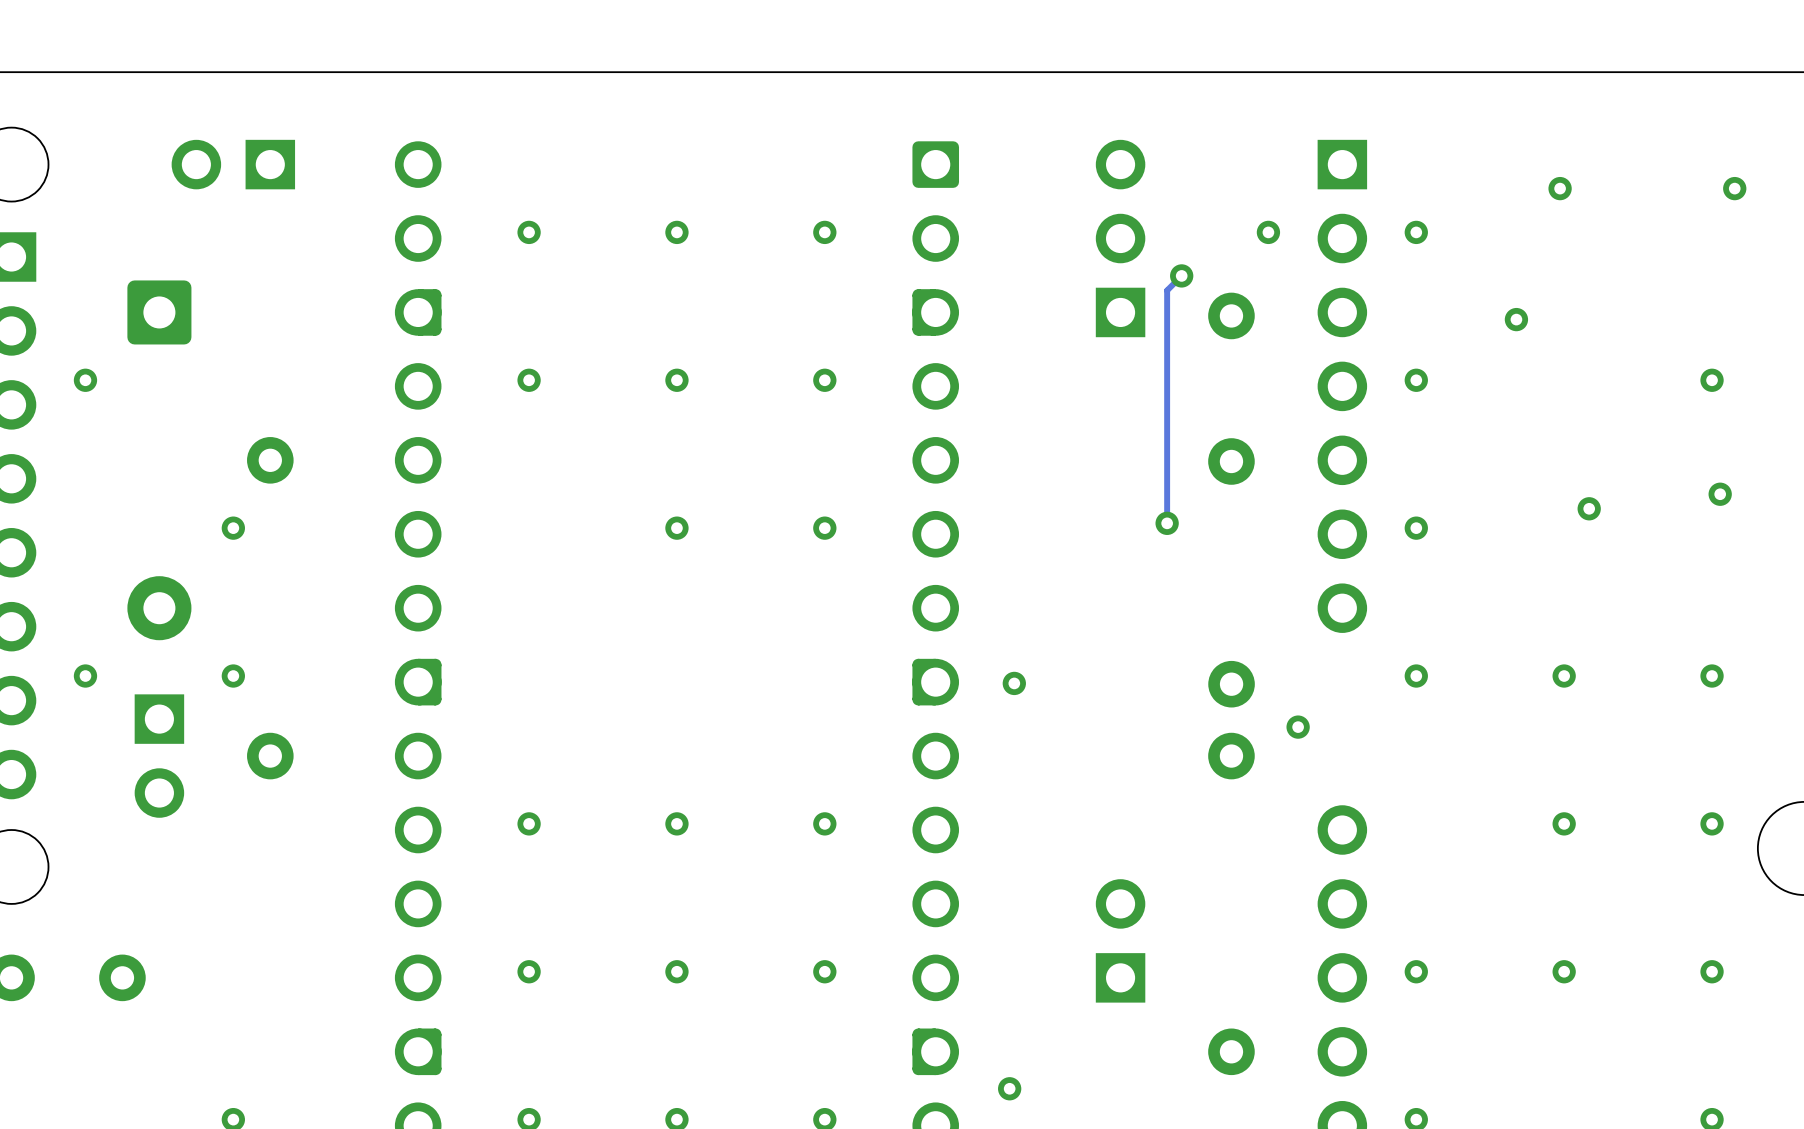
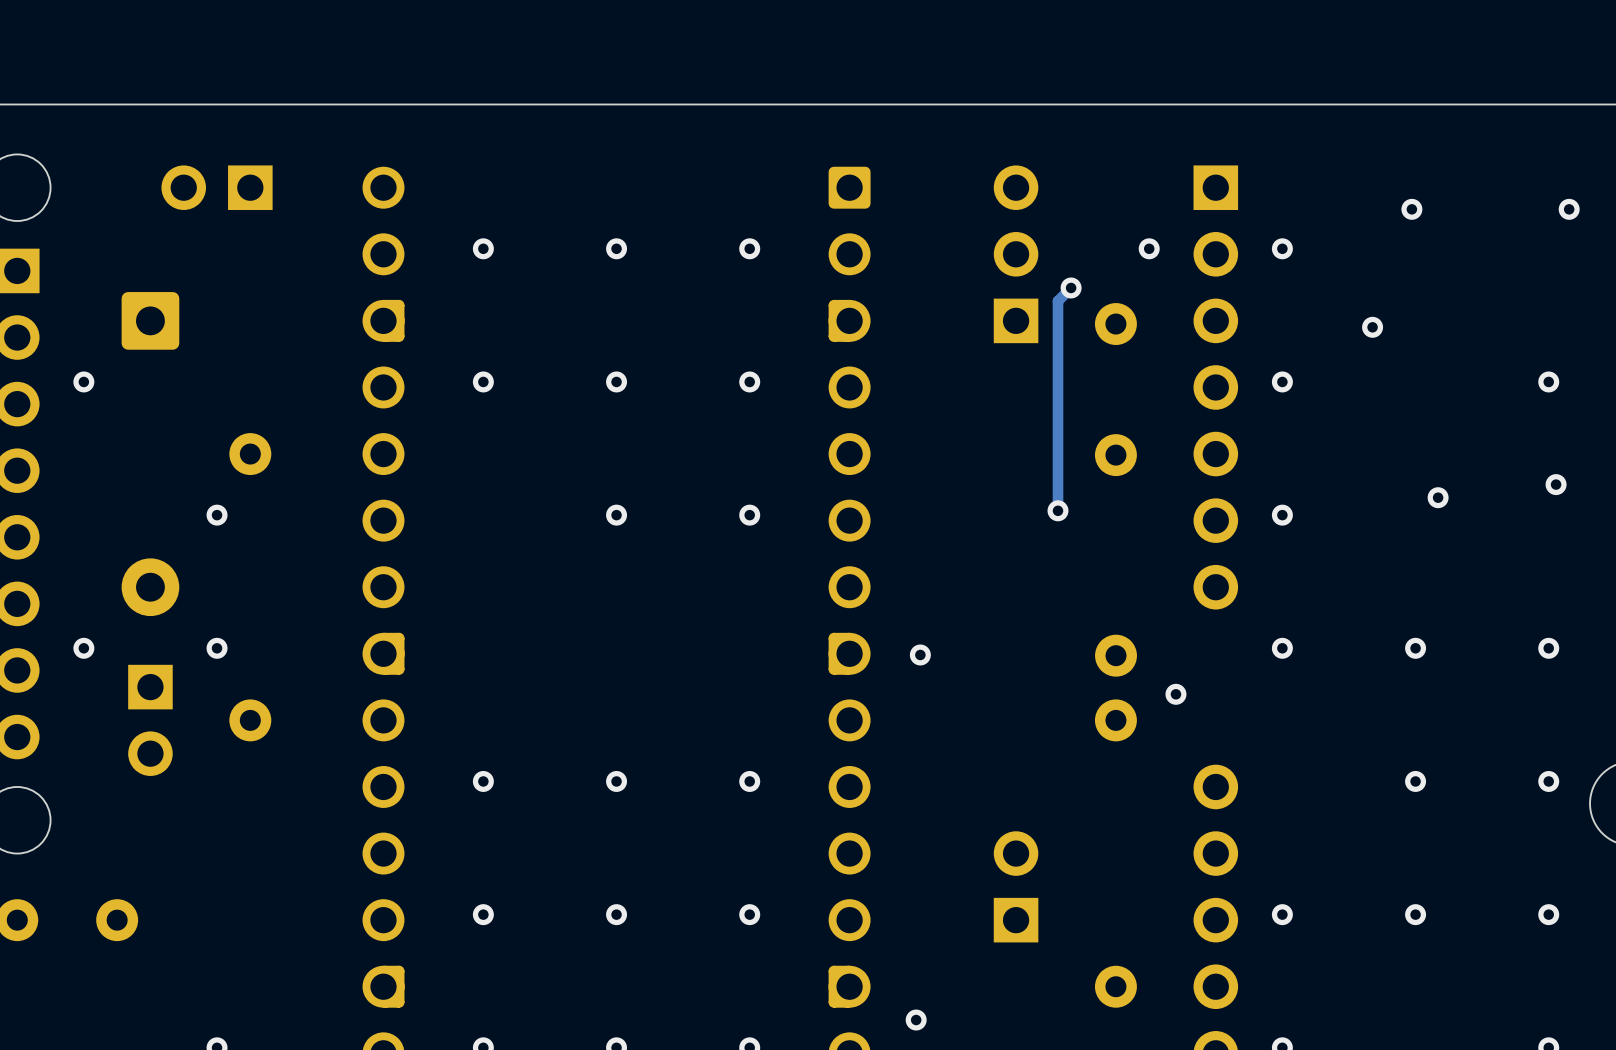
track width: thin (1181, 275) (1167, 290) (1167, 523) -> thick (1071, 287) (1058, 301) (1058, 510)

